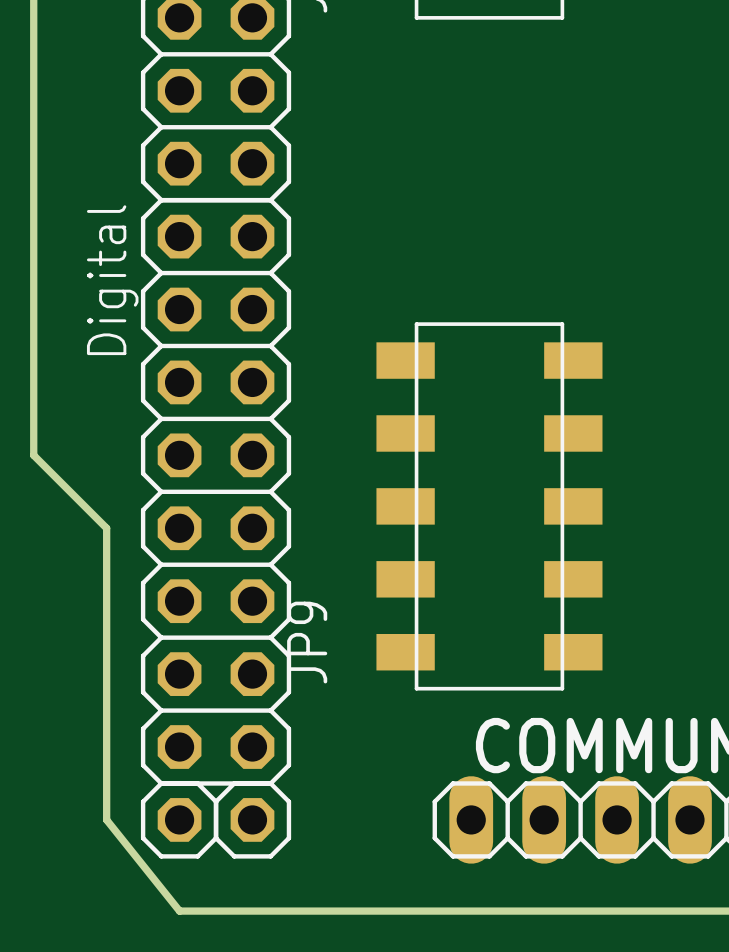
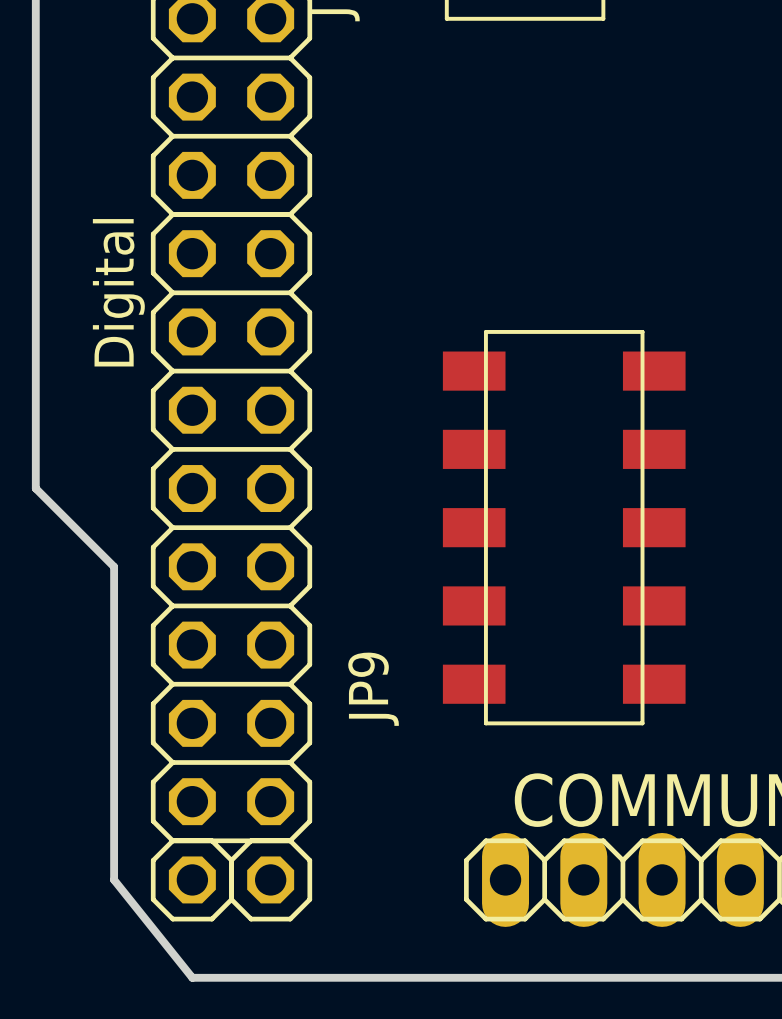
JP9 position: (489, 506) -> (564, 527)

